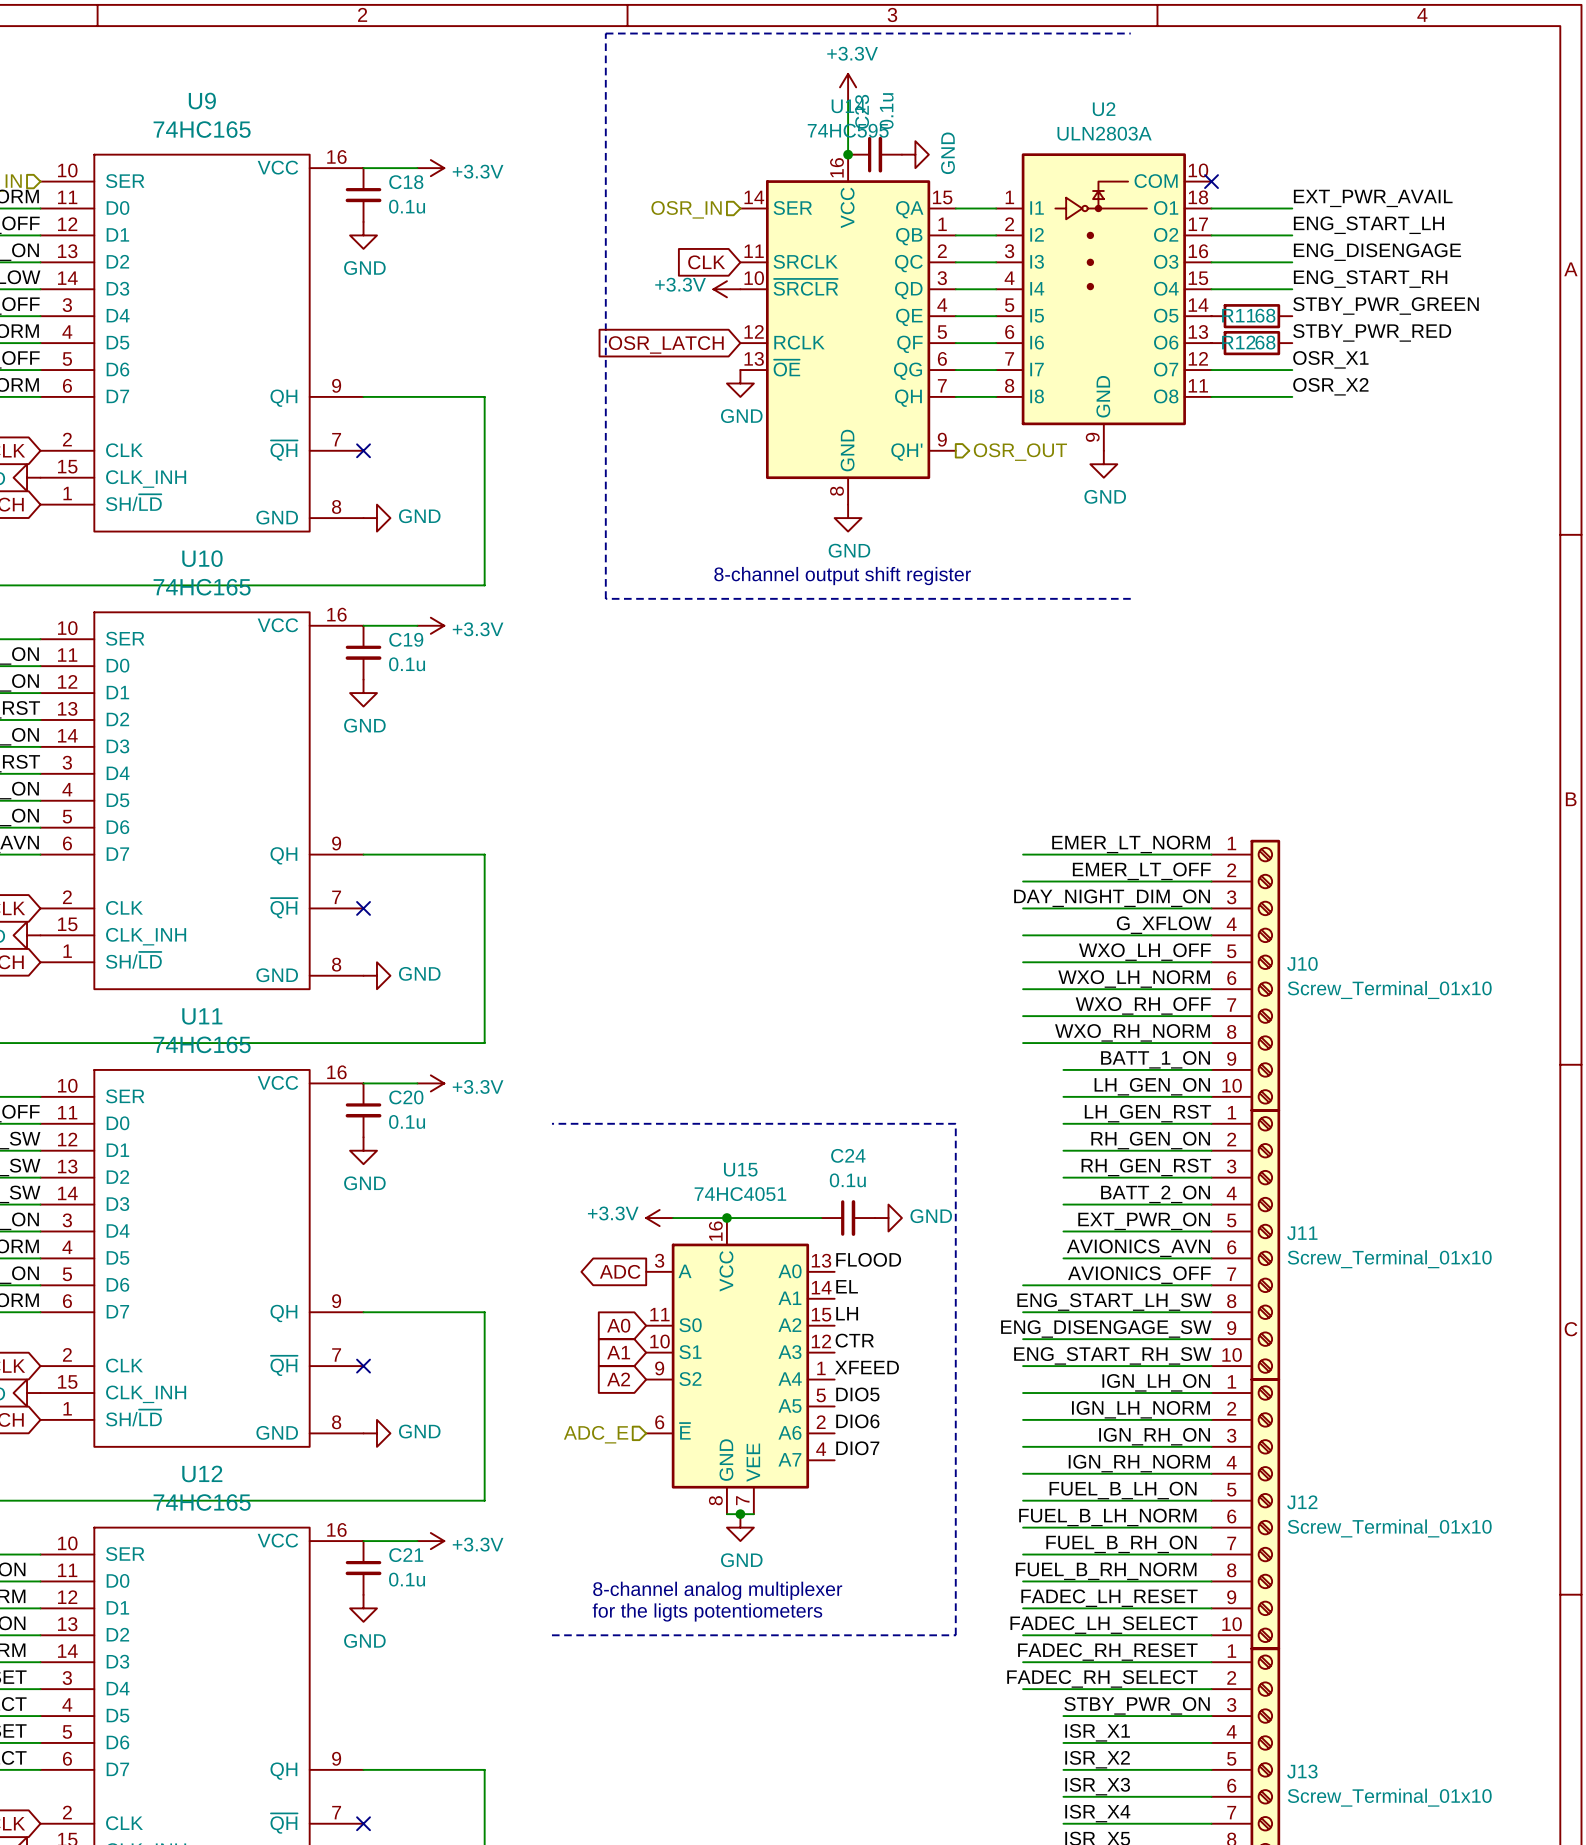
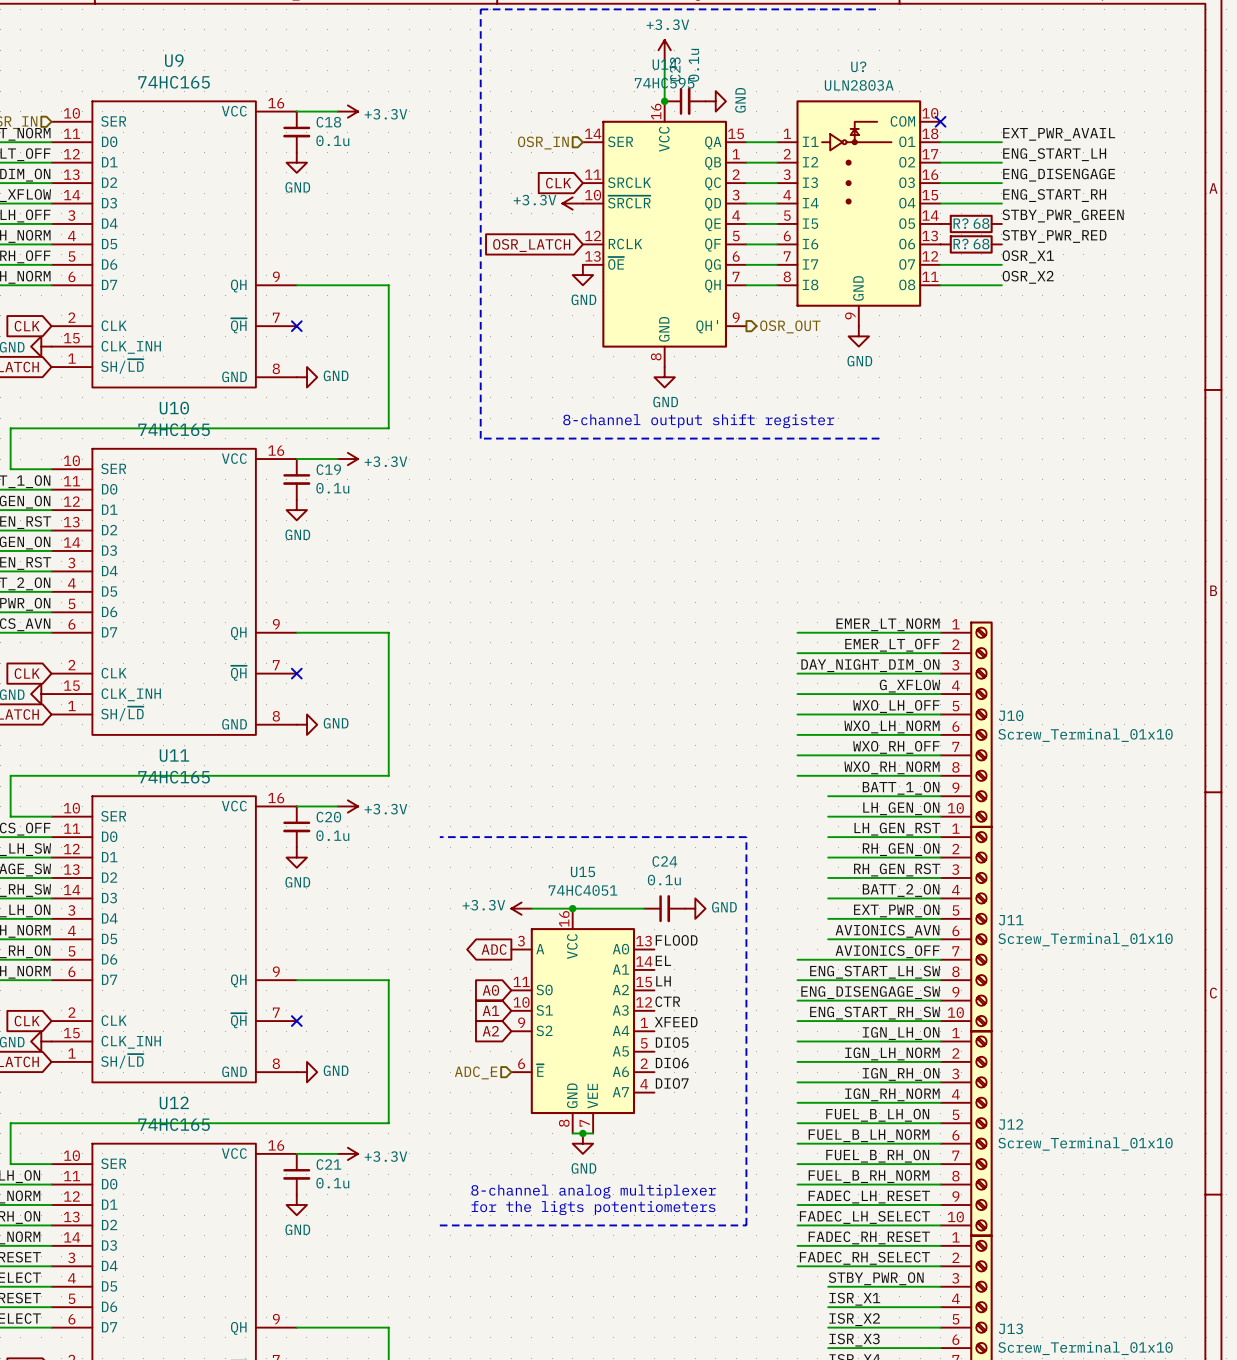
U2 name: U2 (1104, 109) -> U? (858, 66)
R11 name: R11 (1238, 315) -> R? (961, 223)
R12 name: R12 (1238, 342) -> R? (961, 244)

